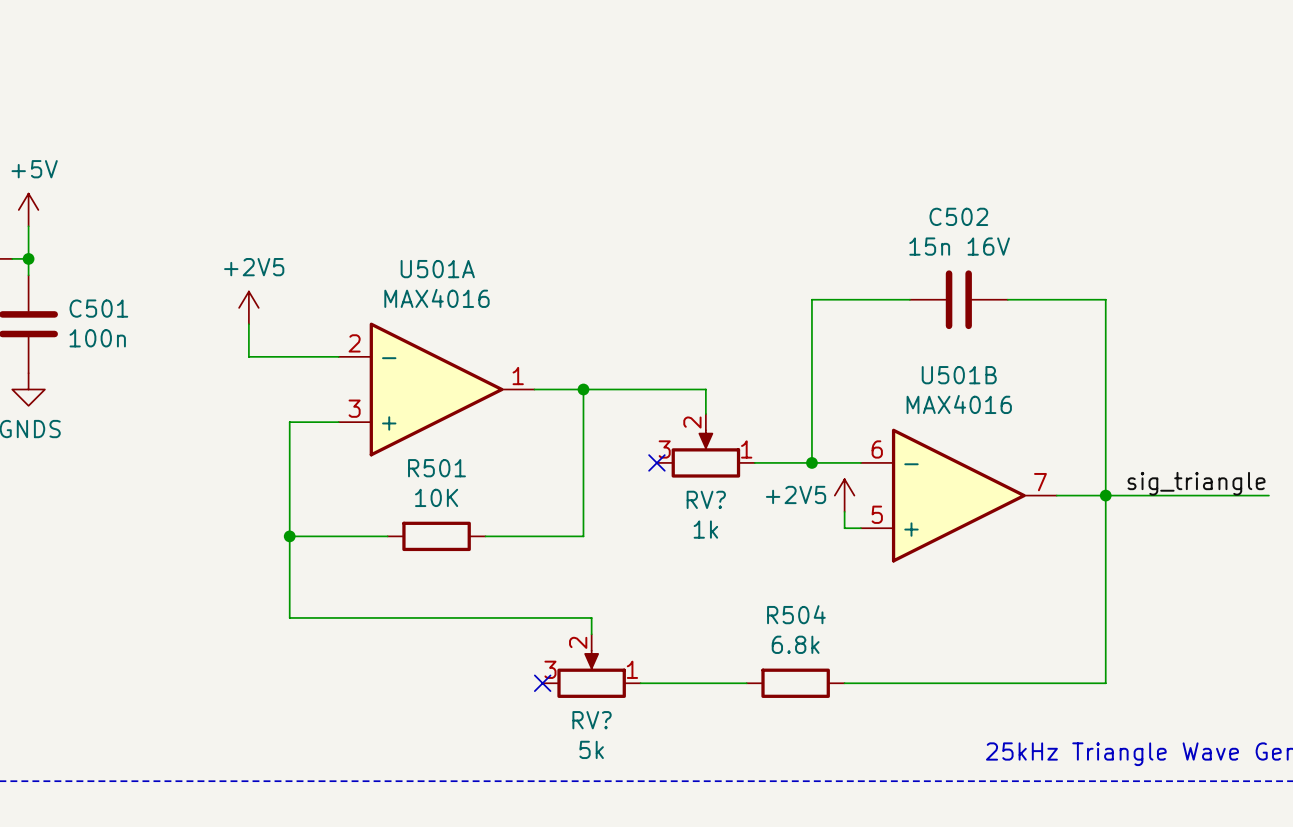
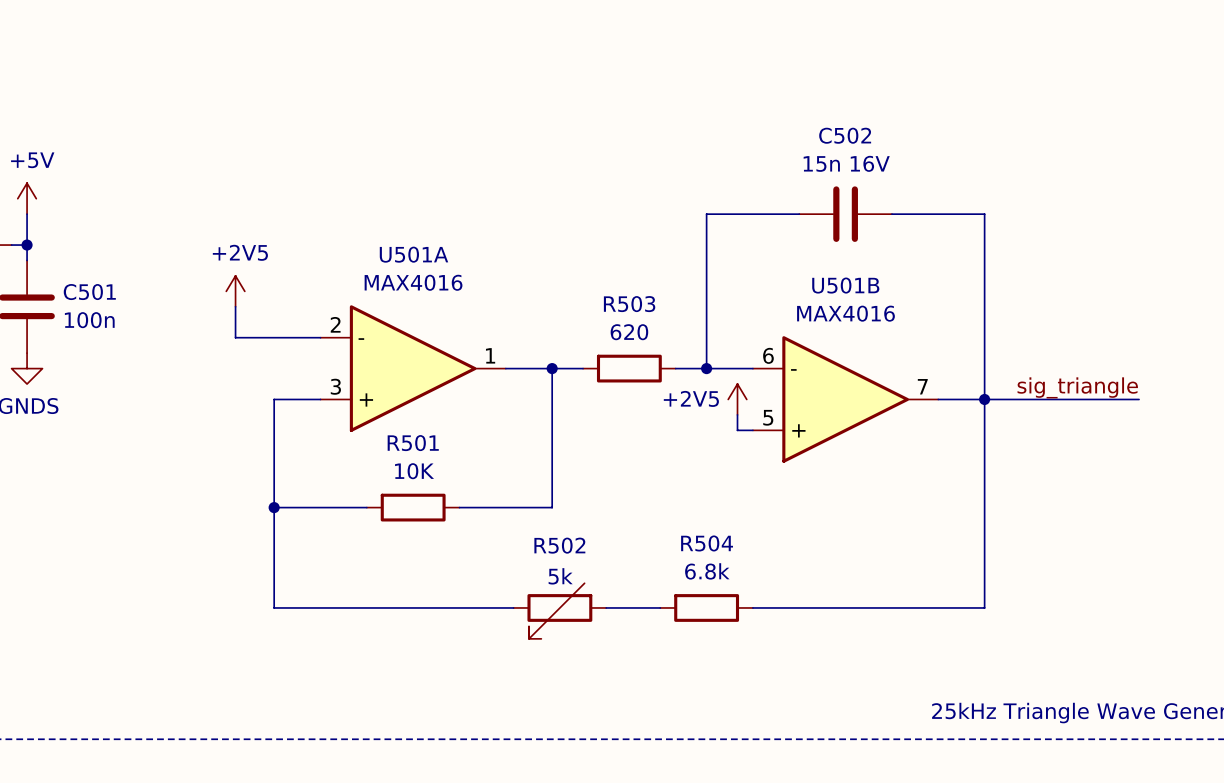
wire: none -> (891, 214) (984, 214) (984, 607) (752, 607)
wire: (909, 299) (811, 299) (811, 462) -> (799, 214) (706, 214) (706, 368)
C502 position: (958, 299) -> (845, 214)
wire: (1007, 299) (1105, 299) (1105, 683) (844, 683) -> none
wire: (616, 389) (705, 389) (705, 413) -> none
R503: none -> 620 (629, 368)
wire: none -> (675, 368) (752, 368)
junction: none -> (706, 368)
junction: none -> (984, 399)
RV?: 1k (705, 445) -> none
no-connect mark: (656, 462) -> none
wire: (754, 462) (860, 462) -> none
junction: (811, 462) -> none
label position: sig_triangle (1196, 483) -> sig_triangle (1077, 387)
power symbol position: +2V5 (844, 495) -> +2V5 (737, 399)
U501B position: (958, 495) -> (845, 399)
wire: (1056, 495) (1268, 495) -> (938, 399) (1139, 399)
junction: (1105, 495) -> none
wire: (844, 511) (844, 528) (860, 528) -> (737, 414) (737, 430) (752, 430)
wire: (289, 617) (591, 617) (591, 634) -> (274, 584) (274, 607) (513, 607)
wire: none -> (606, 607) (660, 607)
R502: none -> 5k (559, 611)
RV?: 5k (591, 666) -> none
no-connect mark: (542, 683) -> none
wire: (640, 683) (746, 683) -> none
R504 position: (795, 683) -> (706, 607)

